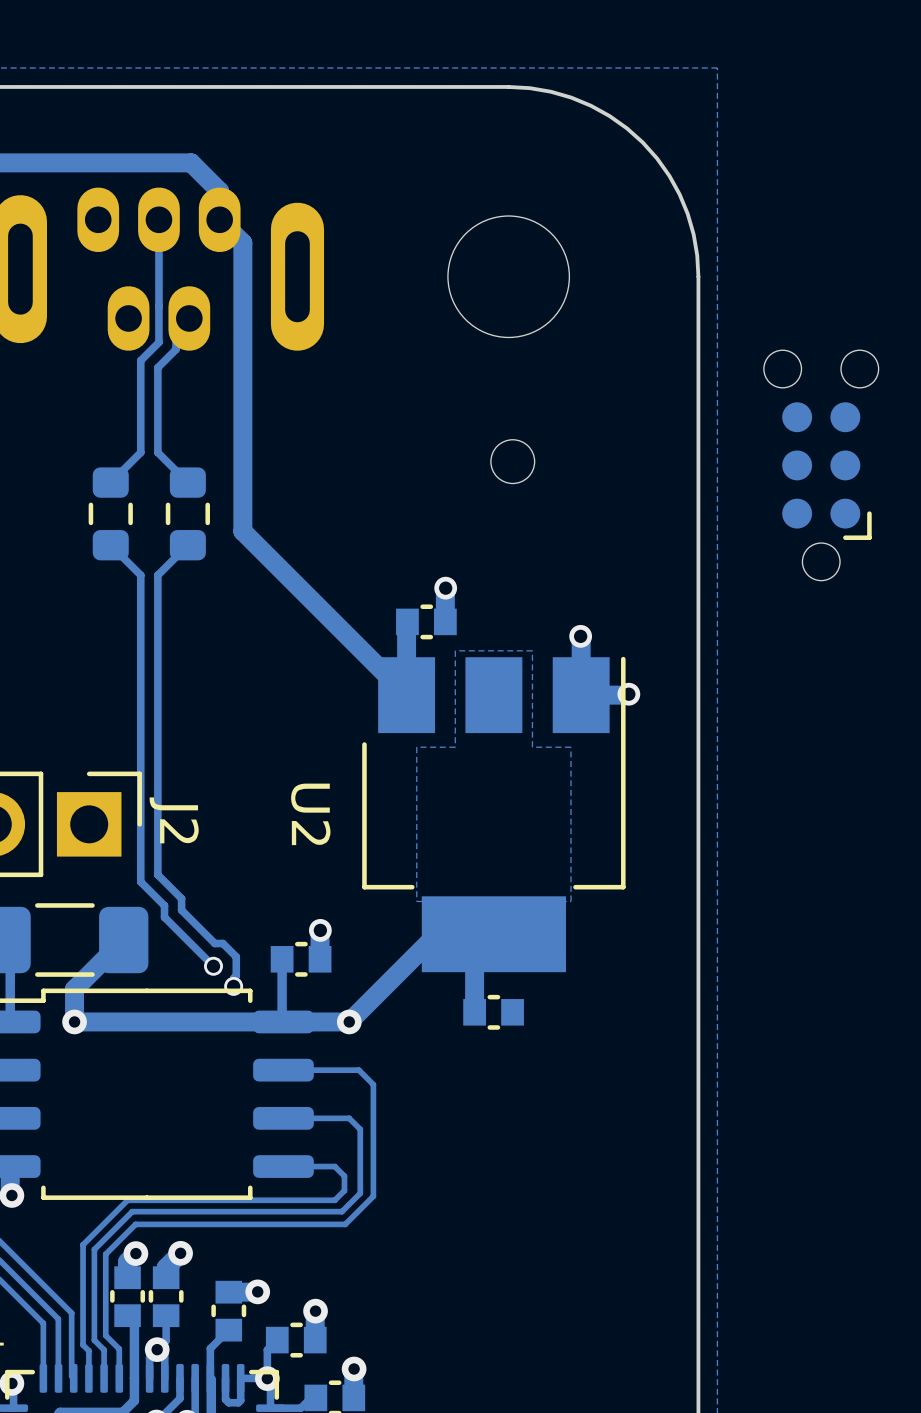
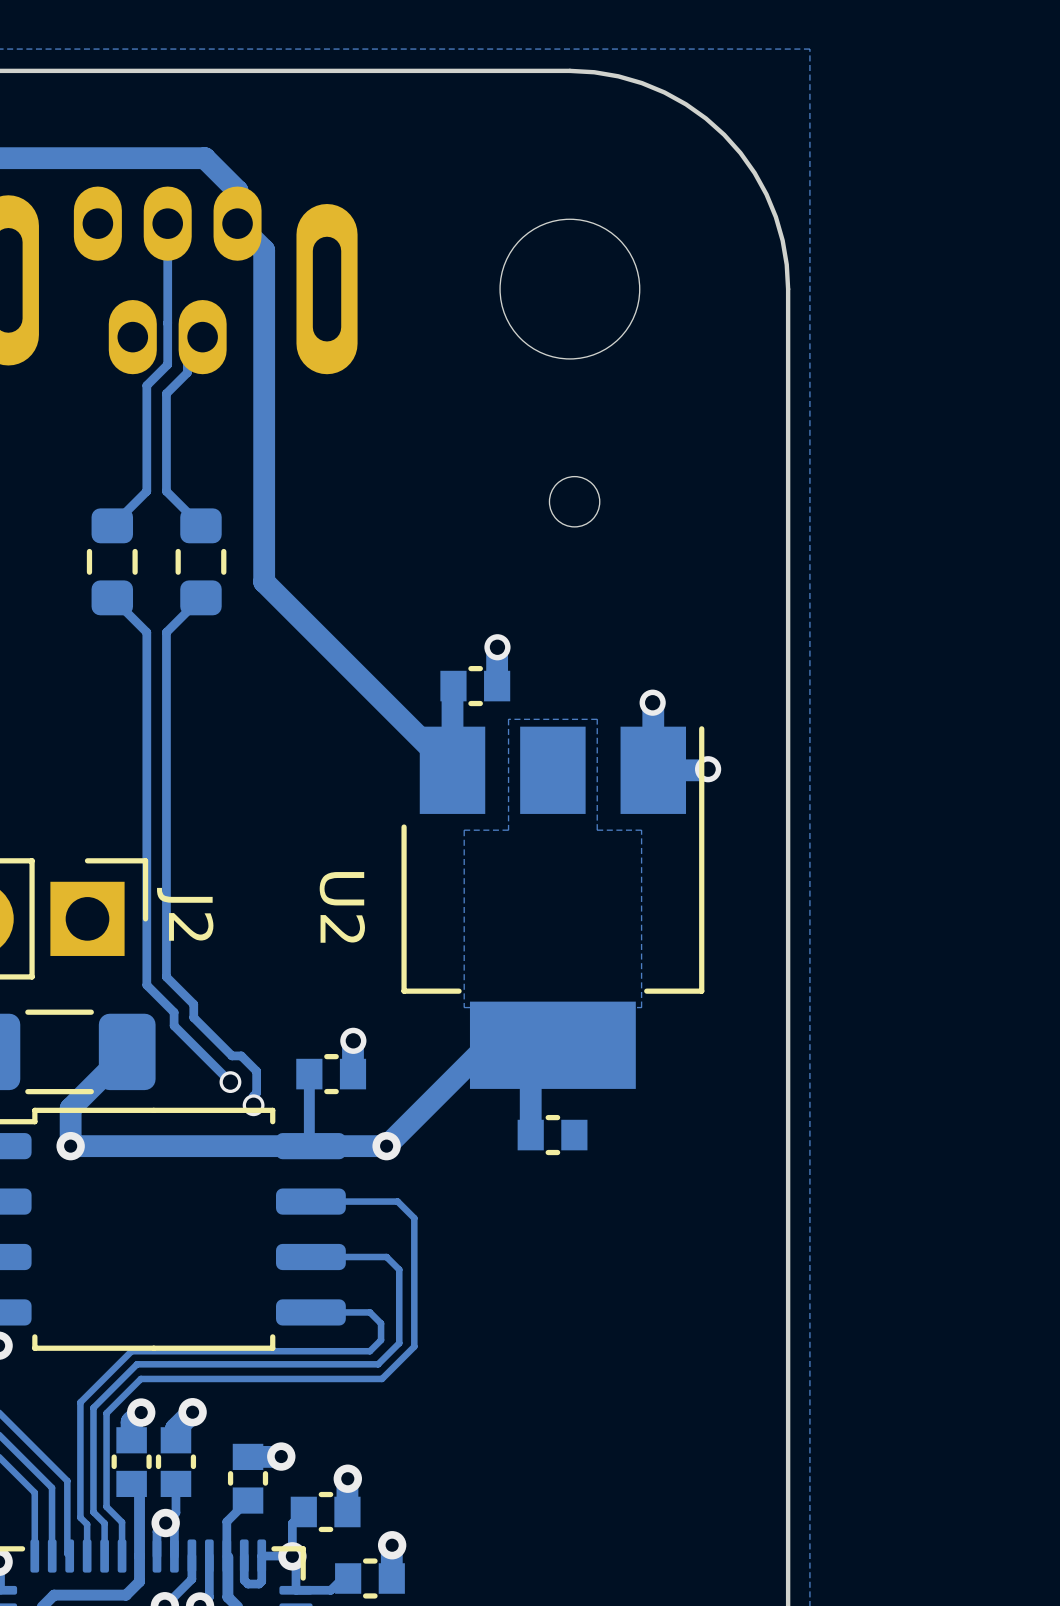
part: (821, 465) -> none

